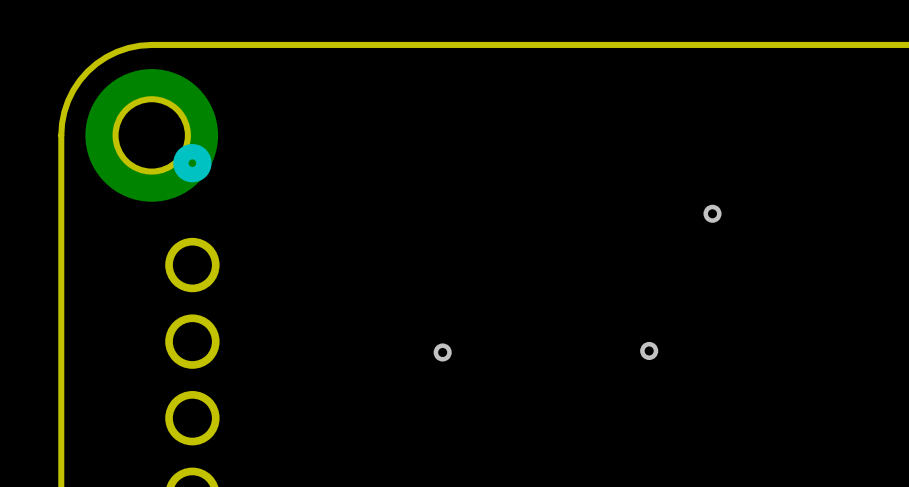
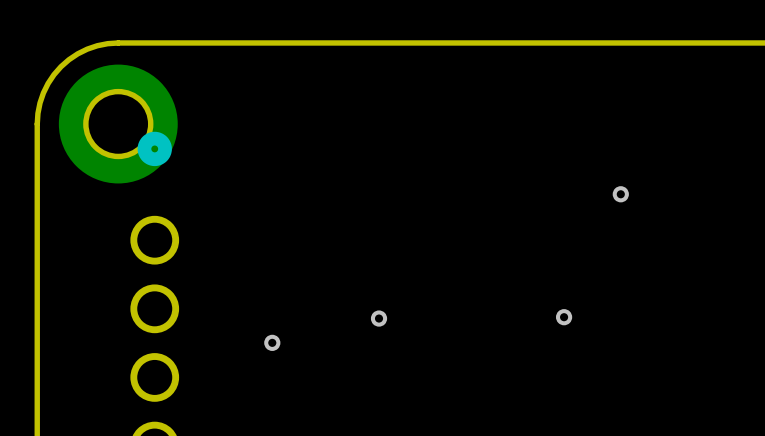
via: none -> (272, 342)

